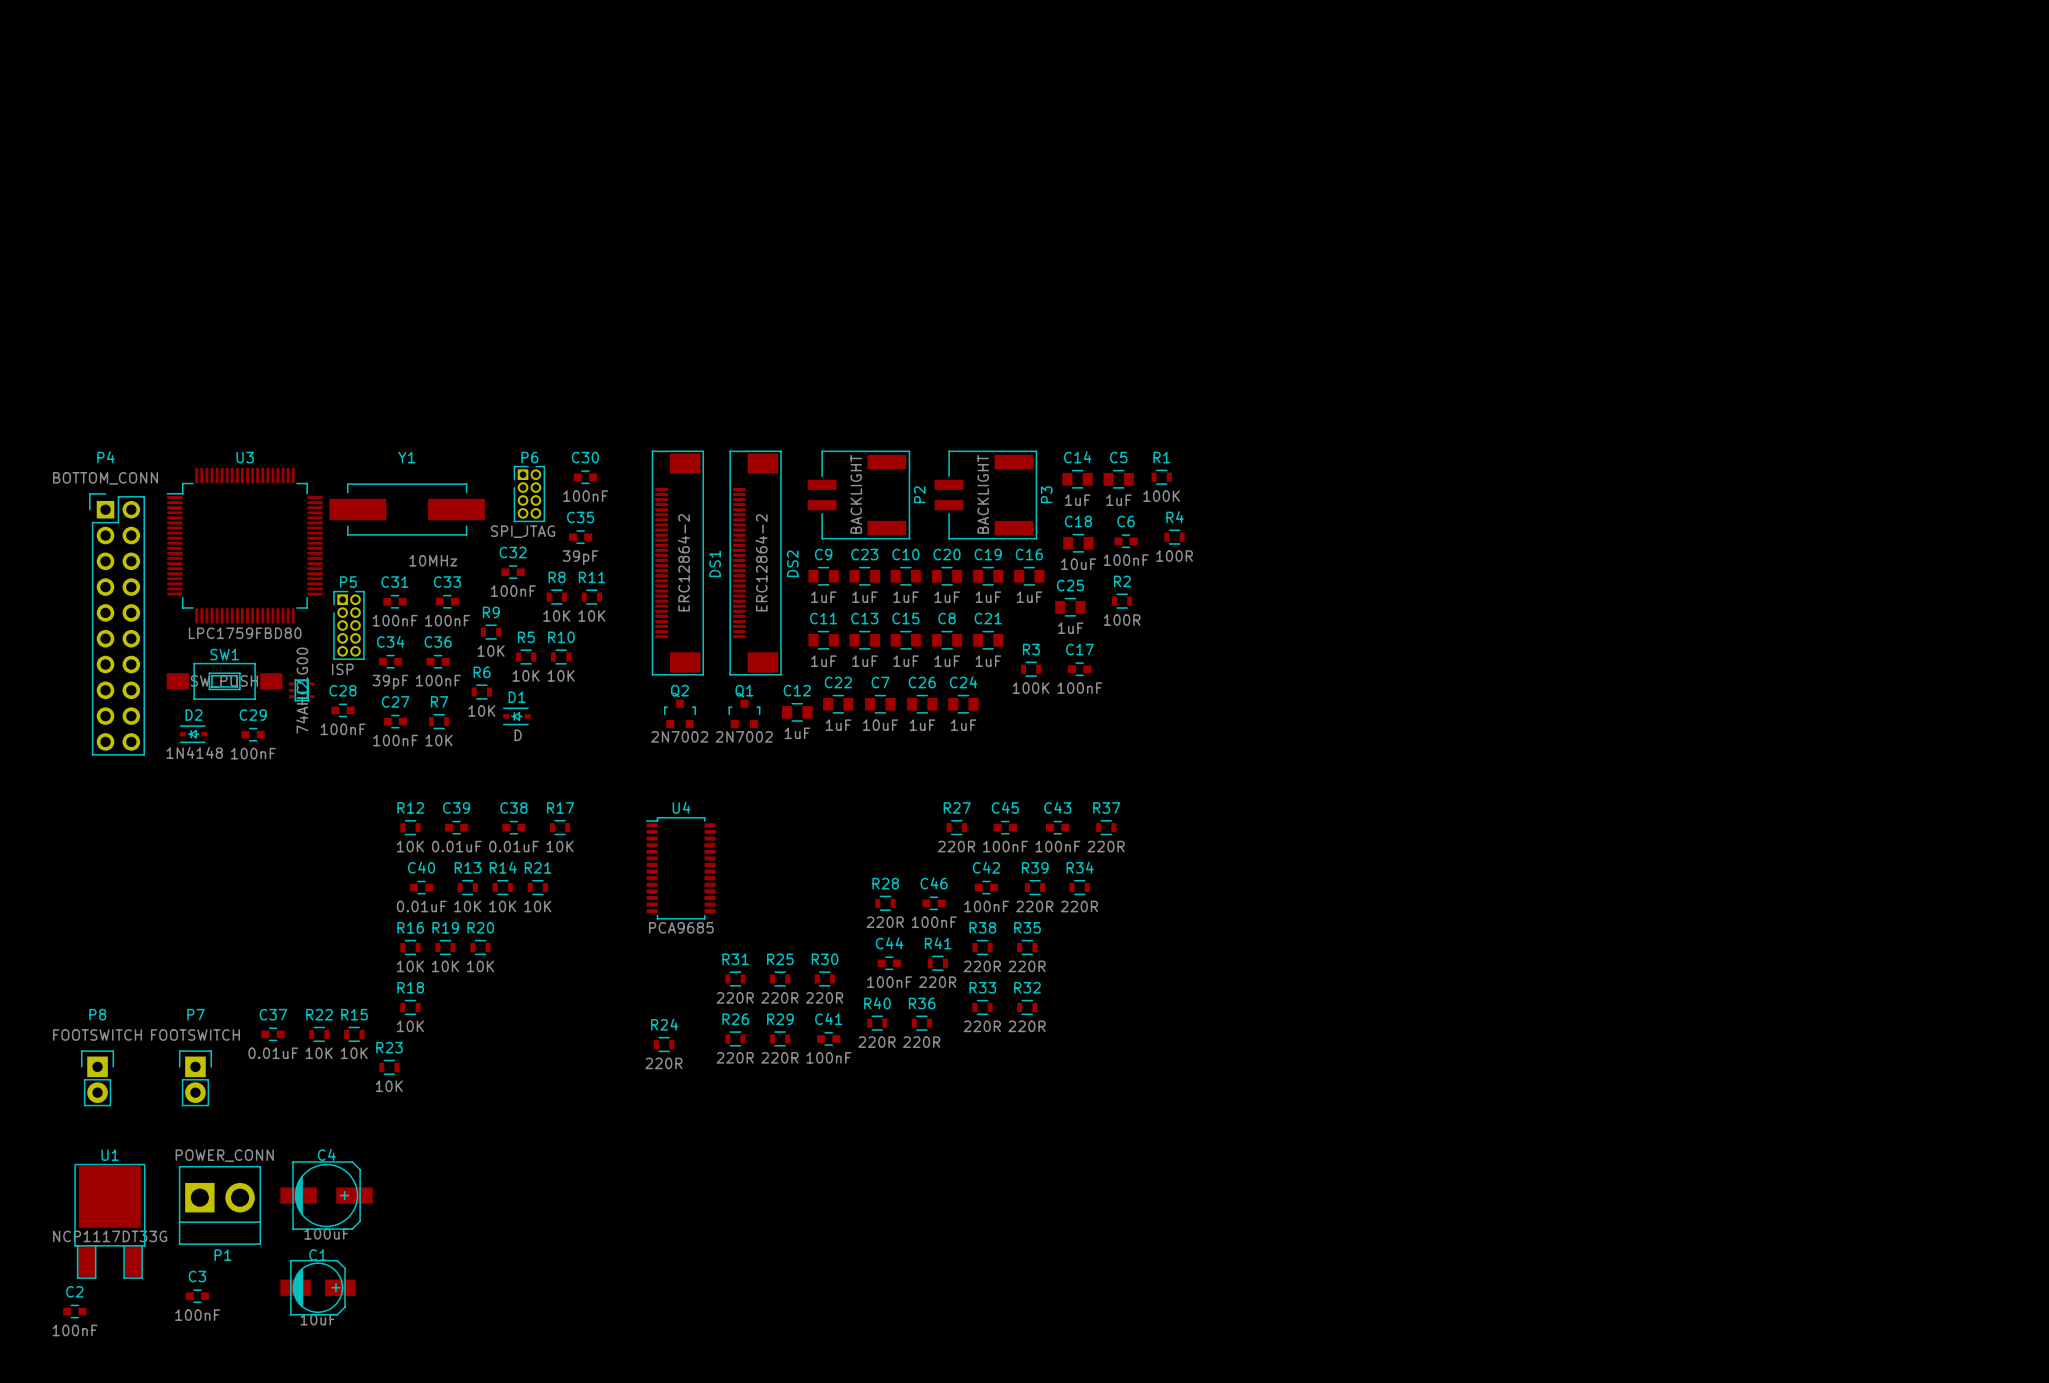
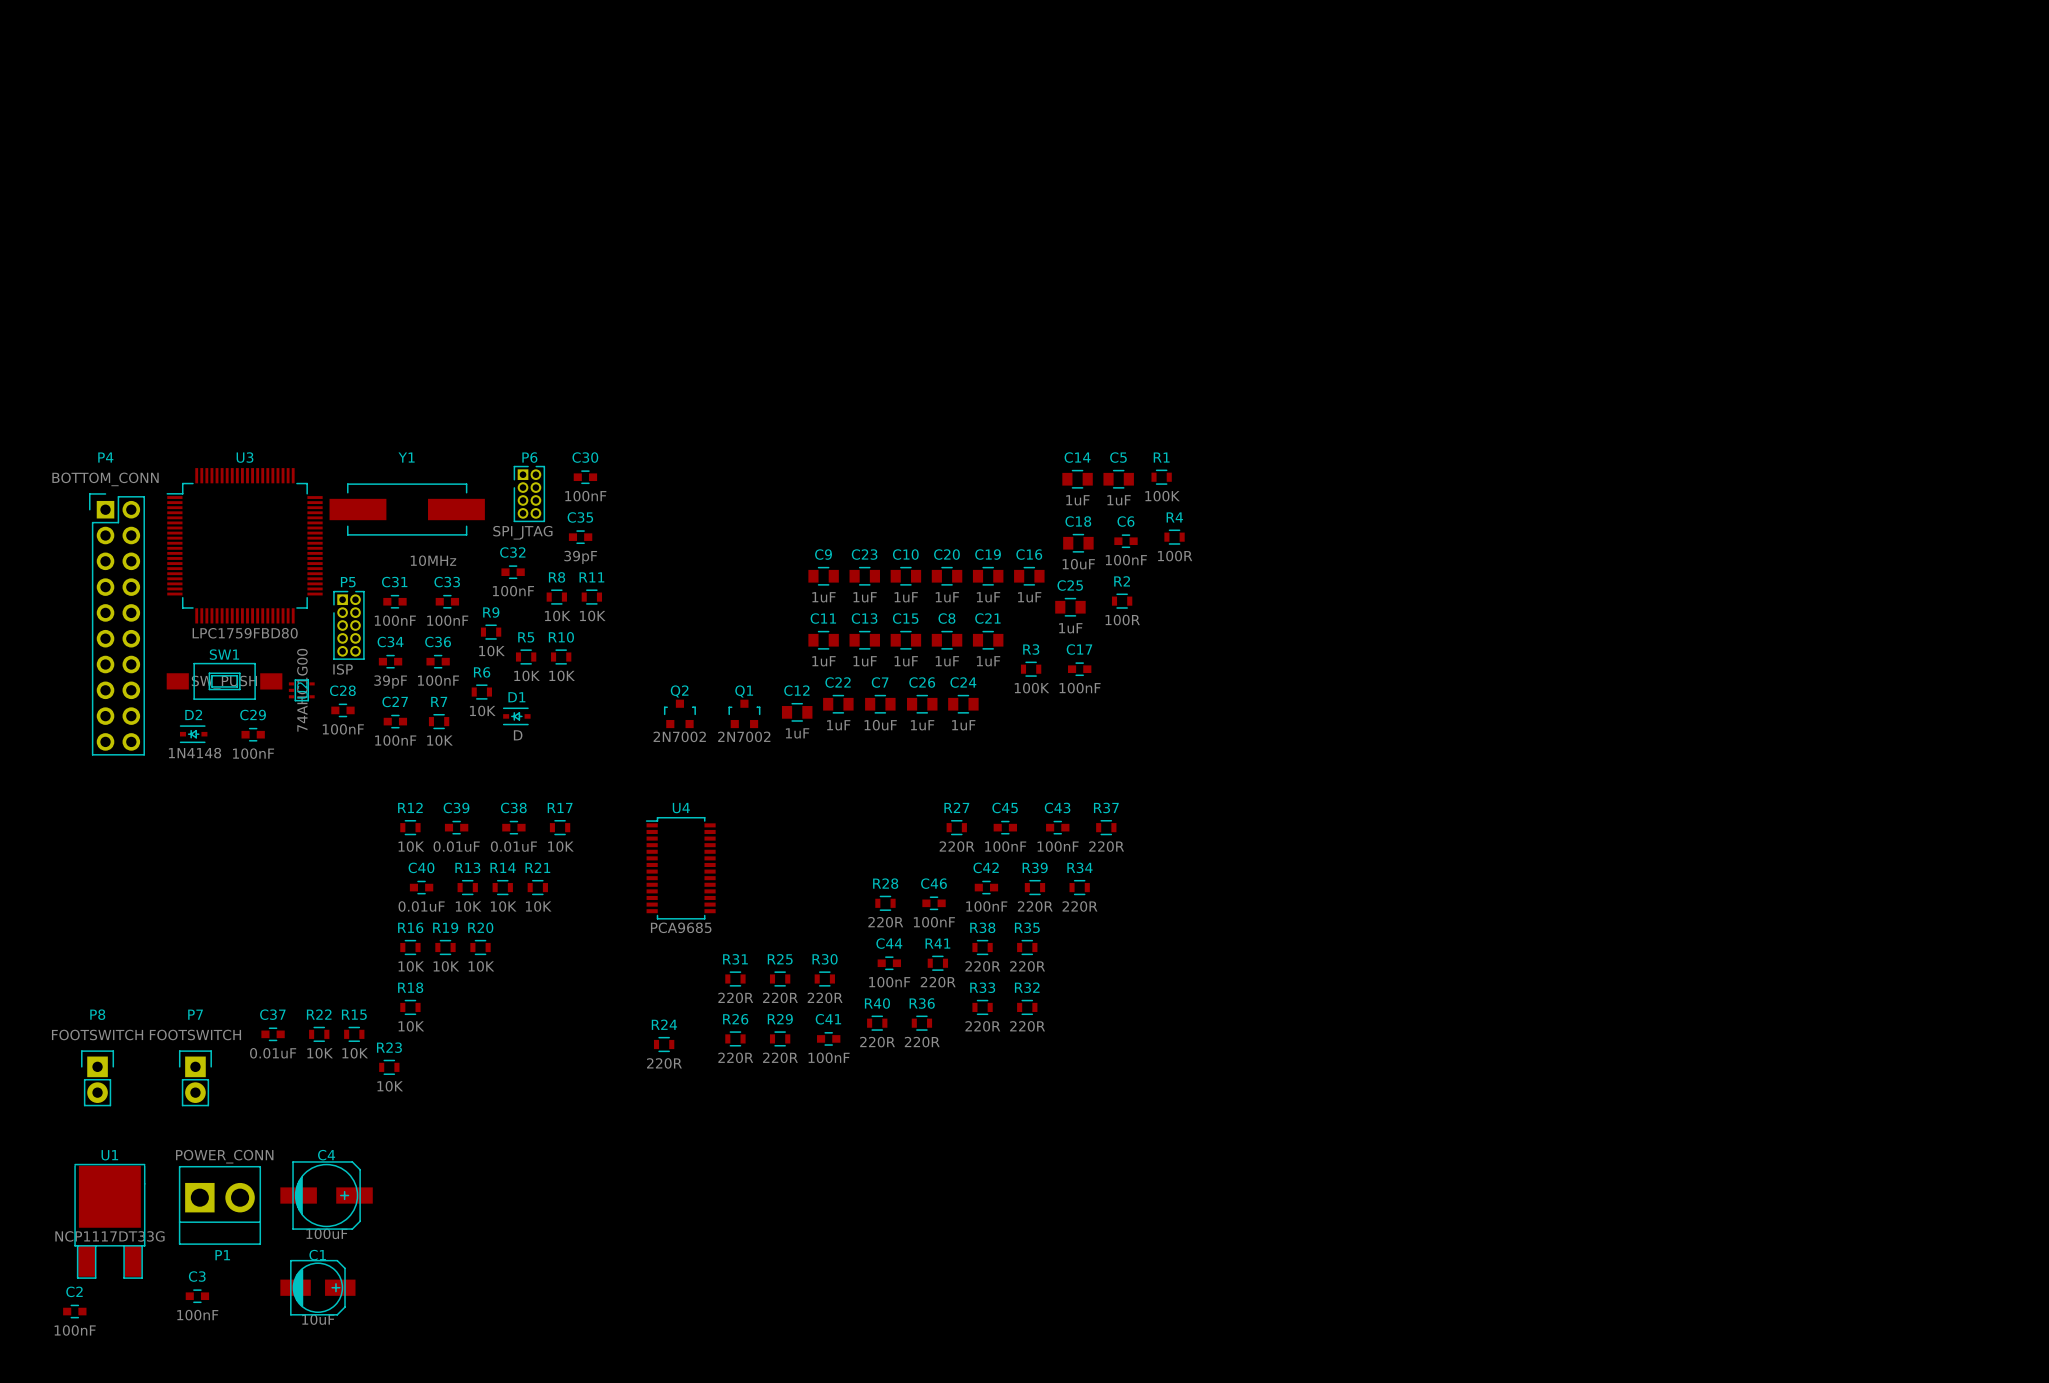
P2: BACKLIGHT (858, 494) -> none
P3: BACKLIGHT (985, 494) -> none
DS1: ERC12864-2 (677, 563) -> none
DS2: ERC12864-2 (755, 563) -> none

